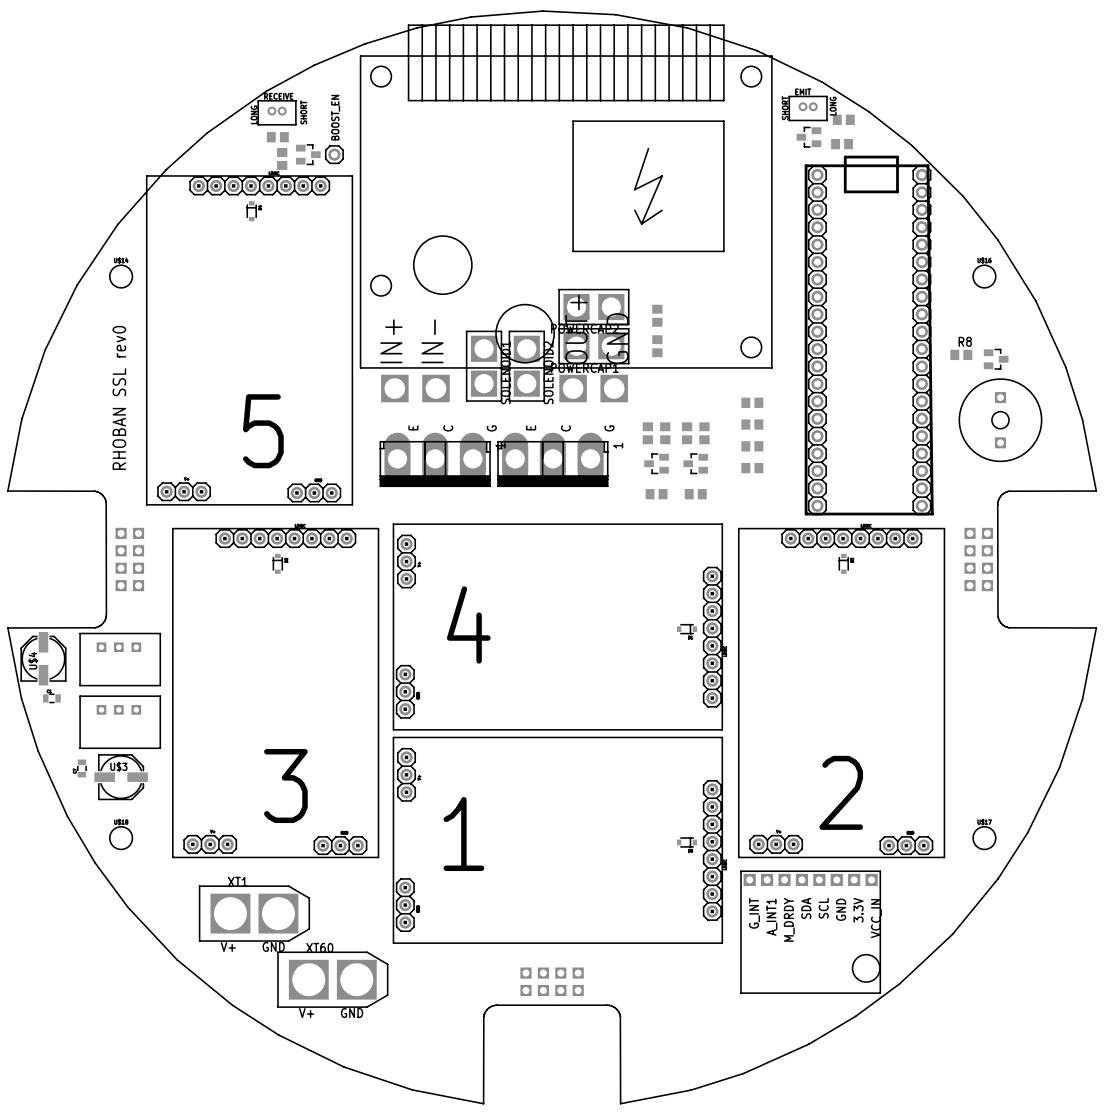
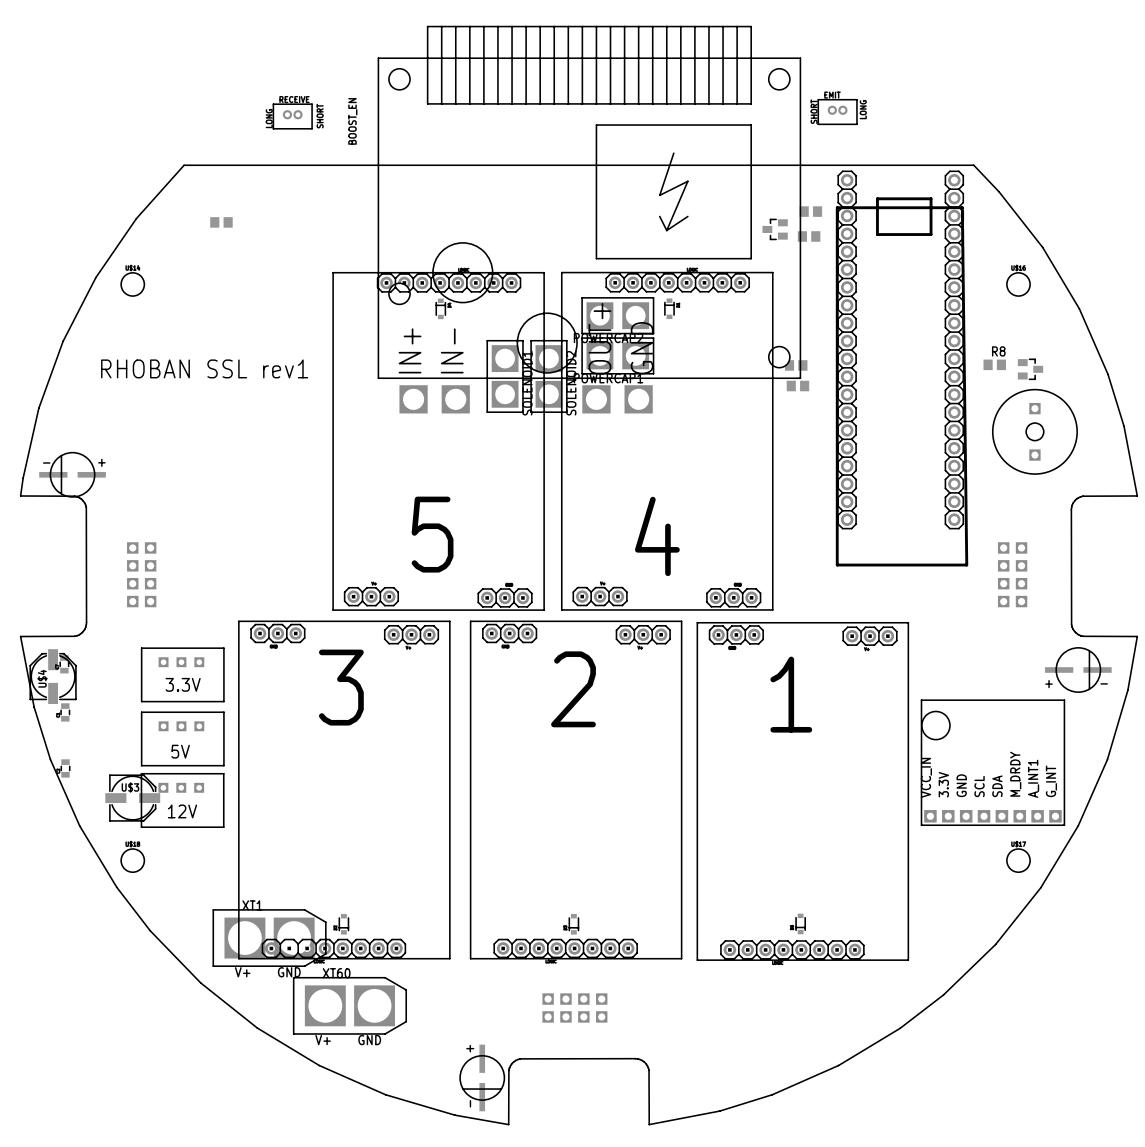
part: (843, 119) -> none
part: (277, 137) -> none
part position: (808, 137) -> (775, 229)
part: (842, 144) -> none
part: (308, 154) -> none
part: (334, 154) -> none
line: (845, 157) (845, 191) (897, 191) (897, 157) (845, 157) -> (877, 198) (877, 234) (931, 234) (931, 198) (877, 198)
part: (282, 159) -> none
line: (806, 165) (806, 514) (932, 514) (927, 165) (806, 165) -> (837, 207) (837, 565) (966, 565) (962, 207) (837, 207)
part: none -> (810, 211)
part position: (251, 211) -> (440, 308)
part: none -> (221, 222)
part: none -> (809, 236)
part: (657, 315) -> none
part: (249, 340) -> none
part: (657, 346) -> none
part: none -> (796, 365)
part: none -> (797, 386)
text: RHOBAN SSL rev0 (119, 397) -> RHOBAN SSL rev1 (204, 368)
part: (752, 402) -> none
part: (752, 424) -> none
part: none -> (438, 441)
part: none -> (667, 441)
text: 5 (263, 431) -> none
part: (647, 433) -> none
part: (665, 433) -> none
part: (687, 433) -> none
part: (704, 433) -> none
part: (752, 446) -> none
part: (435, 459) -> none
part: (552, 459) -> none
part: none -> (72, 474)
part: (656, 463) -> none
part: (695, 463) -> none
part: (752, 468) -> none
board edge: none -> (77, 496) (20, 495) (38, 408) (63, 341) (95, 277) (136, 218) (184, 165) (973, 165) (998, 191) (1042, 247) (1079, 308) (1108, 374) (1124, 426) (1137, 495) (1082, 496) (1076, 499) (1071, 507) (1071, 624) (1074, 631) (1080, 635)
board edge: none -> (77, 496) (83, 500) (86, 507) (85, 627) (81, 633) (74, 636) (20, 636) (34, 707) (50, 759) (79, 825) (116, 887) (150, 930) (200, 982) (257, 1028) (319, 1065) (385, 1094) (455, 1115) (508, 1124) (509, 1067)
board edge: (97, 491) (7, 491) (21, 419) (45, 350) (77, 285) (117, 224) (165, 169) (207, 133) (266, 91) (314, 65) (365, 43) (417, 27) (471, 17) (542, 11) (615, 14) (687, 27) (756, 50) (822, 82) (868, 111) (911, 145) (963, 196) (997, 239) (1035, 300) (1065, 367) (1082, 420) (1096, 491) (1009, 491) (999, 497) (997, 504) (997, 616) (1000, 623) (1006, 627) -> none
board edge: (97, 491) (103, 495) (106, 502) (106, 614) (104, 621) (95, 627) (7, 628) (21, 698) (38, 750) (67, 816) (95, 862) (127, 907) (177, 959) (232, 1005) (278, 1035) (343, 1066) (412, 1089) (483, 1103) (484, 1014) -> none
part: (656, 494) -> none
part: (695, 494) -> none
text: none -> 5 (432, 534)
text: none -> 4 (657, 536)
part rotation: 0° (277, 563) -> 180° (343, 924)
part position: (277, 563) -> (343, 924)
part rotation: 0° (843, 563) -> 180° (573, 924)
part position: (843, 563) -> (573, 924)
board edge: none -> (1080, 635) (1137, 636) (1127, 690) (1107, 759) (1078, 825) (1040, 887) (995, 944) (943, 994) (900, 1028) (838, 1065) (772, 1094) (719, 1111) (649, 1124) (649, 1070) (645, 1063) (640, 1059) (520, 1058) (513, 1061) (509, 1067)
text: 4 (468, 624) -> none
part: (557, 627) -> none
board edge: (1006, 627) (1096, 627) (1082, 699) (1059, 767) (1027, 832) (998, 878) (952, 934) (899, 983) (855, 1016) (808, 1044) (743, 1073) (691, 1090) (620, 1103) (620, 1016) (613, 1007) (606, 1005) (497, 1005) (488, 1008) (484, 1014) -> none
part rotation: 0° (687, 629) -> 90° counterclockwise (669, 308)
part position: (687, 629) -> (669, 308)
part: none -> (1078, 669)
part: none -> (182, 674)
part: (120, 659) -> none
text: none -> 3.3V (183, 684)
text: none -> 3 (341, 687)
text: none -> 2 (573, 689)
text: none -> 1 (791, 694)
part: (275, 693) -> none
part: (841, 693) -> none
part rotation: 0° (51, 698) -> 90° clockwise (65, 712)
part: none -> (182, 738)
part: (120, 722) -> none
text: none -> 5V (180, 751)
part: none -> (992, 762)
part: none -> (65, 768)
part position: (81, 768) -> (64, 664)
part: none -> (344, 790)
part: none -> (576, 790)
part: none -> (802, 791)
part: none -> (182, 800)
text: 3 (285, 786) -> none
text: none -> 12V (182, 811)
text: 2 (841, 792) -> none
text: 1 (463, 834) -> none
part: (557, 840) -> none
part rotation: 0° (687, 842) -> 90° clockwise (800, 923)
part position: (687, 842) -> (800, 923)
part: (810, 932) -> none
part: none -> (482, 1077)

